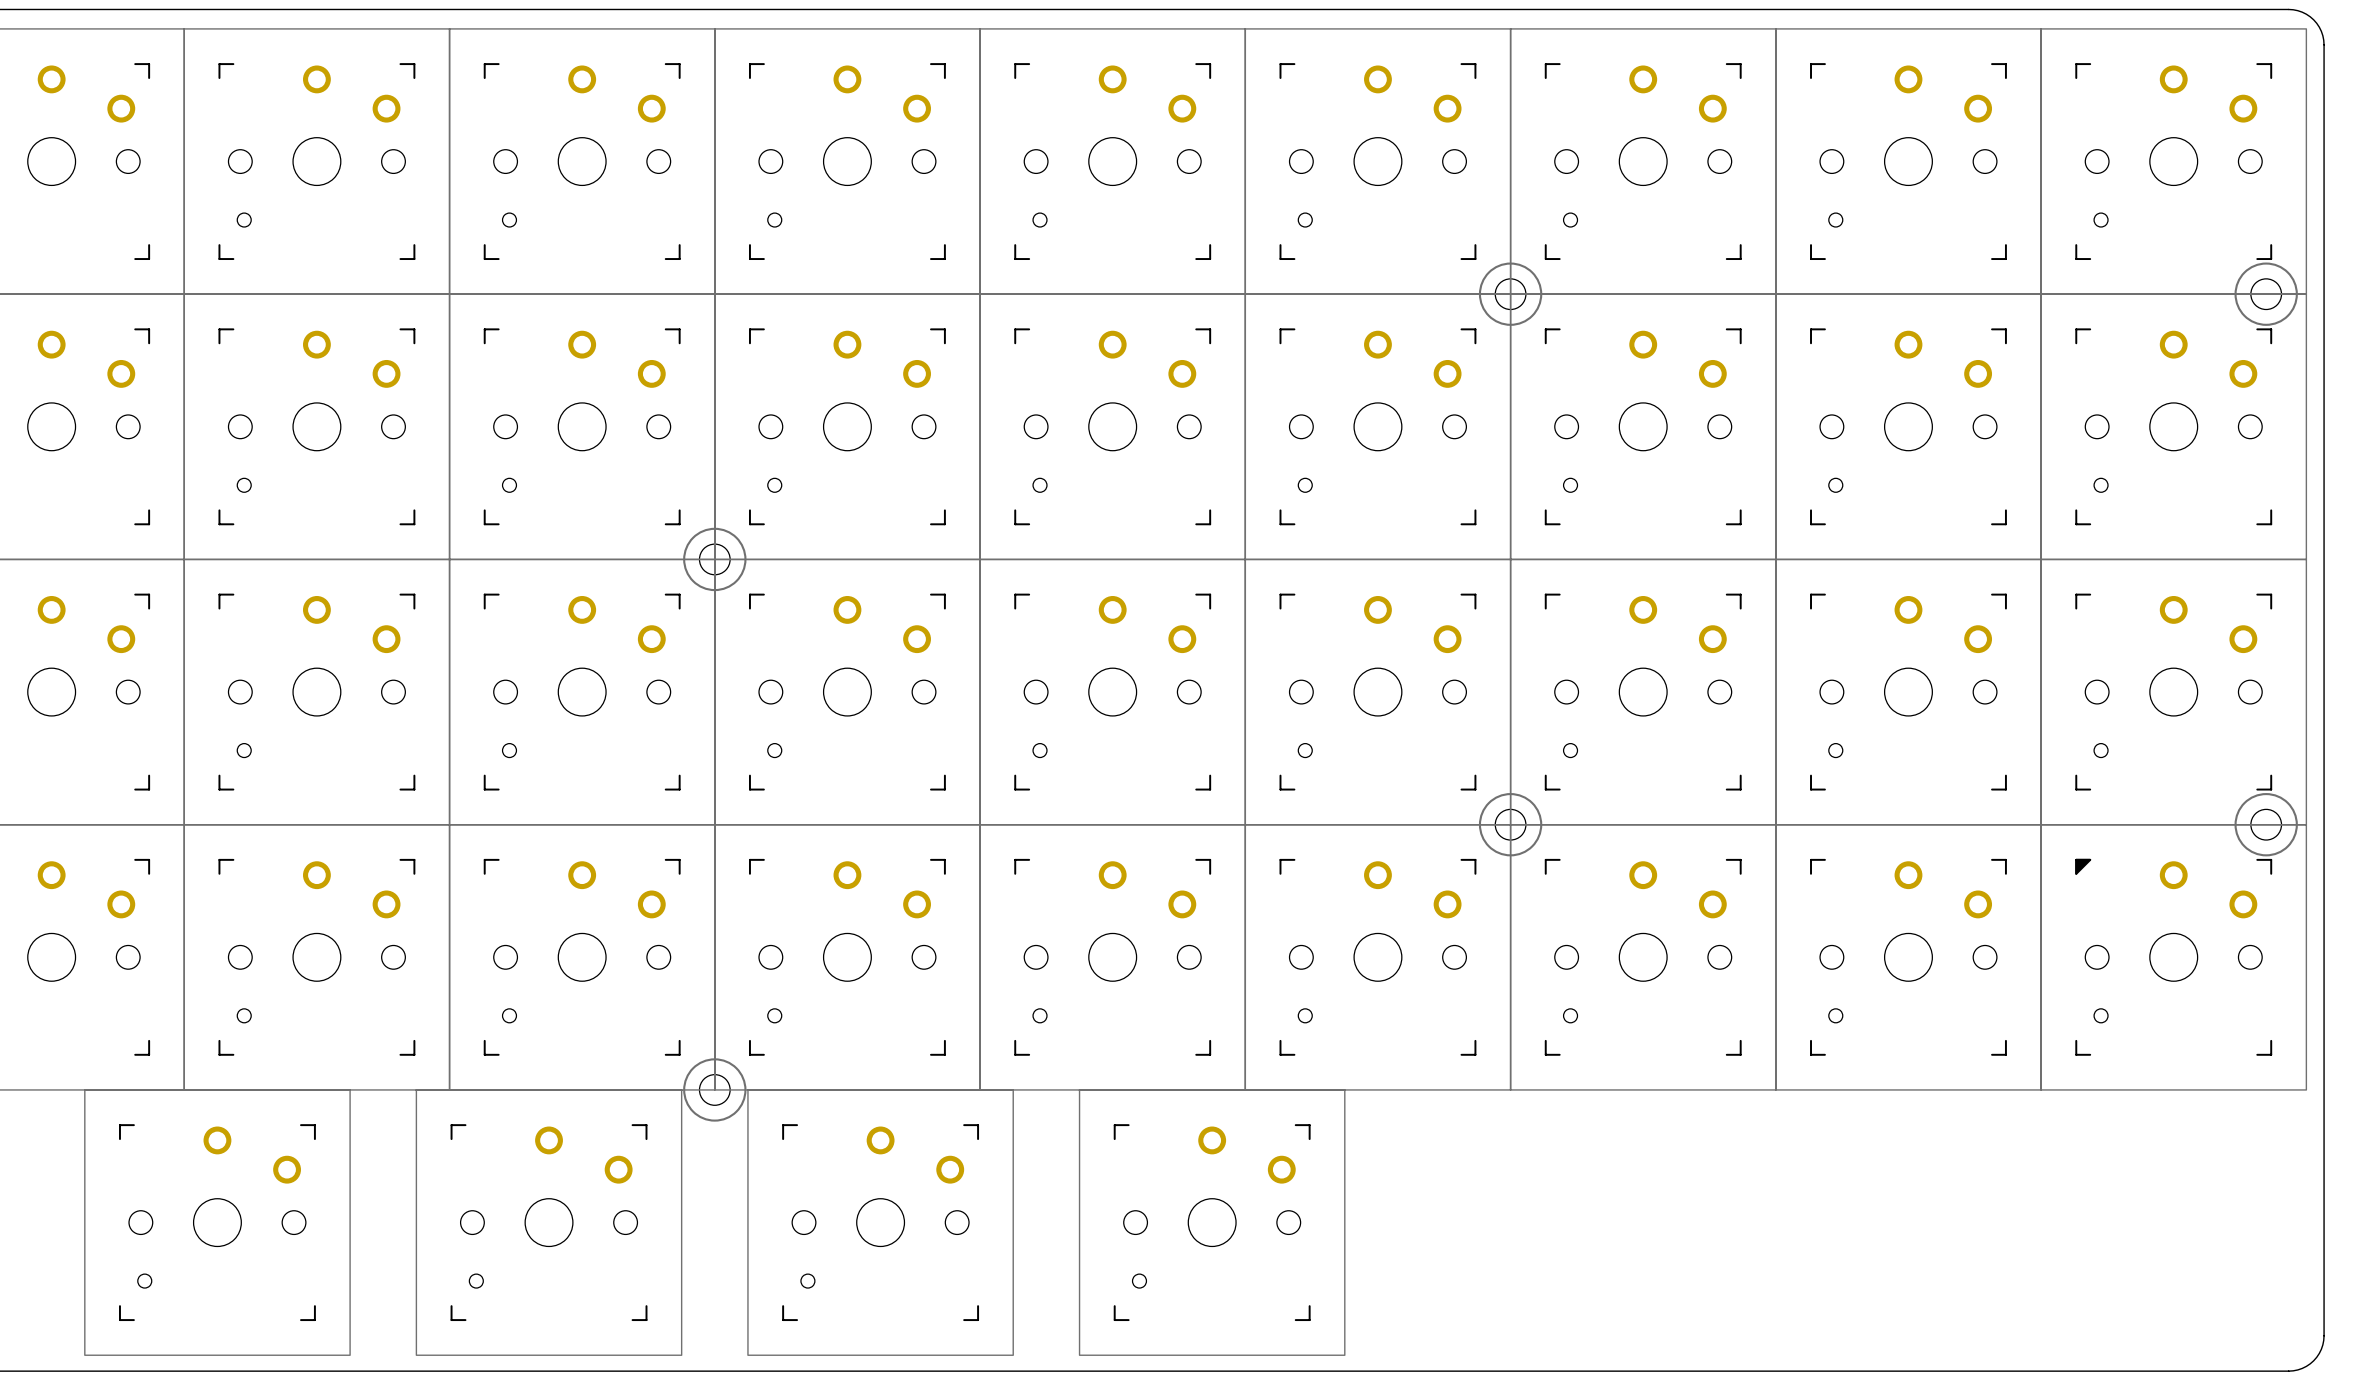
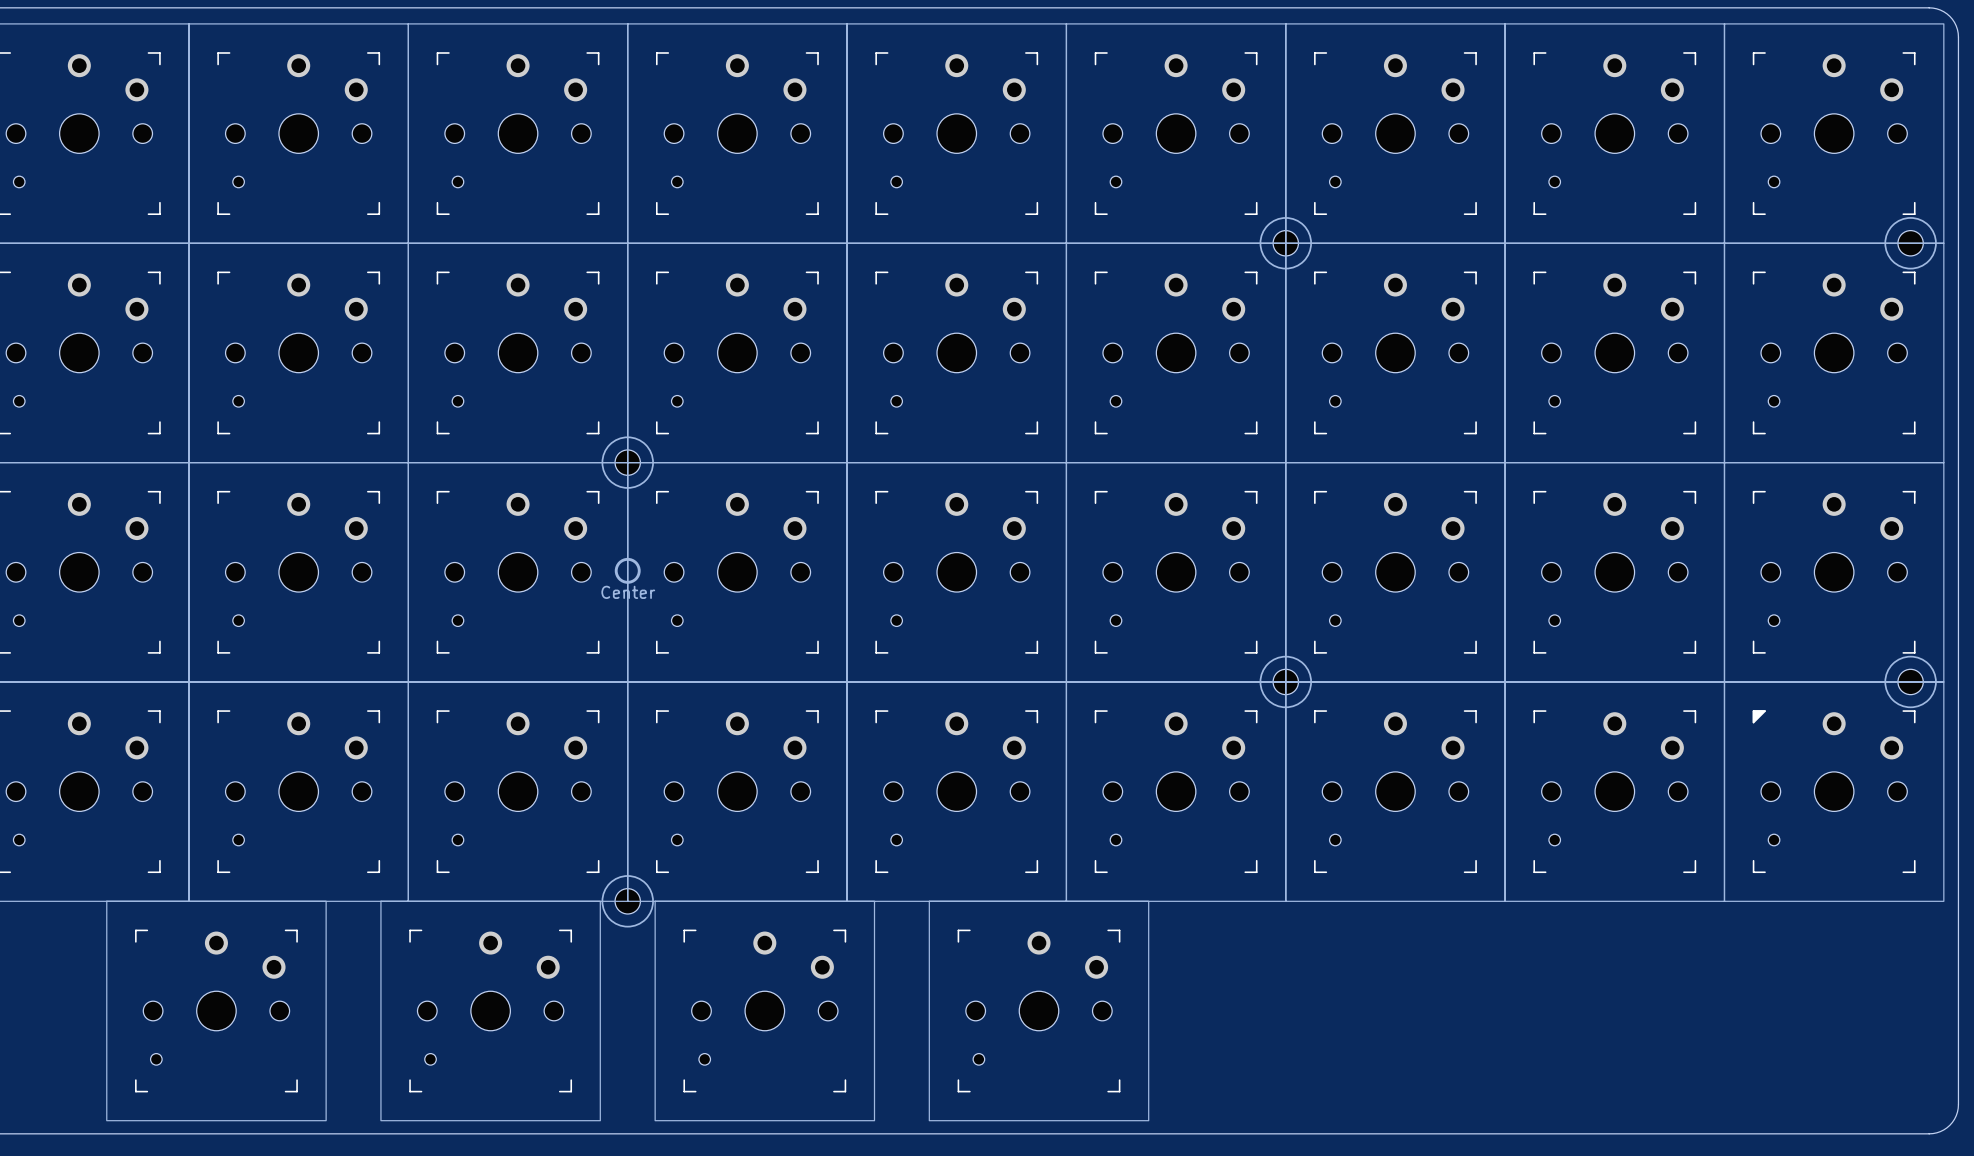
drawing: none -> [614, 557, 641, 584]
text: none -> Center (628, 592)

